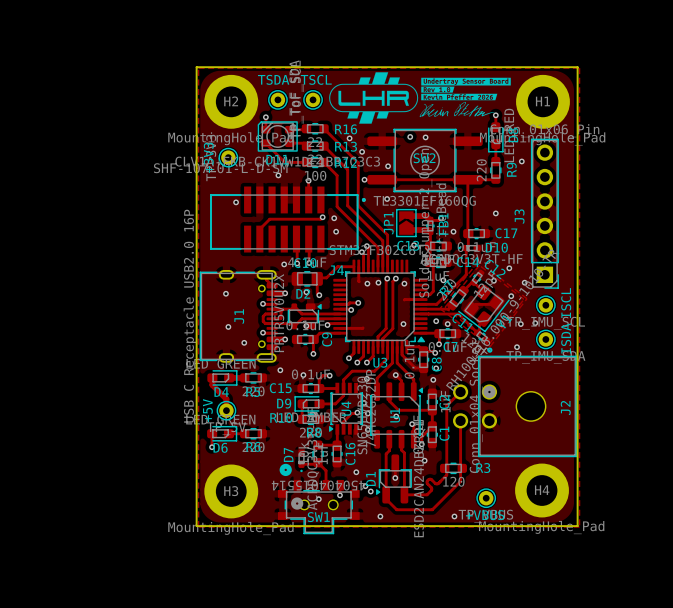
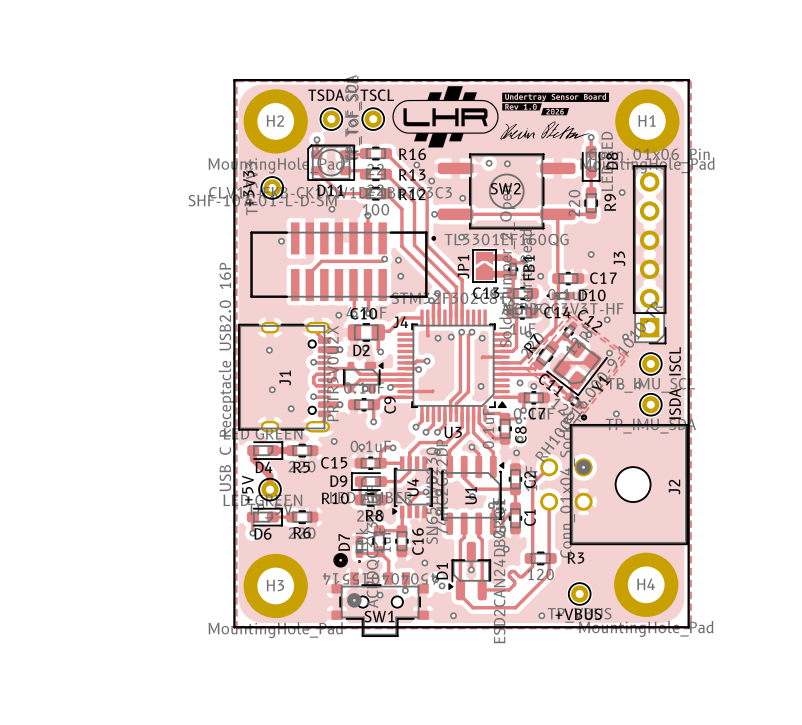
drawing shape: [421, 93, 498, 101] -> [541, 108, 569, 116]

